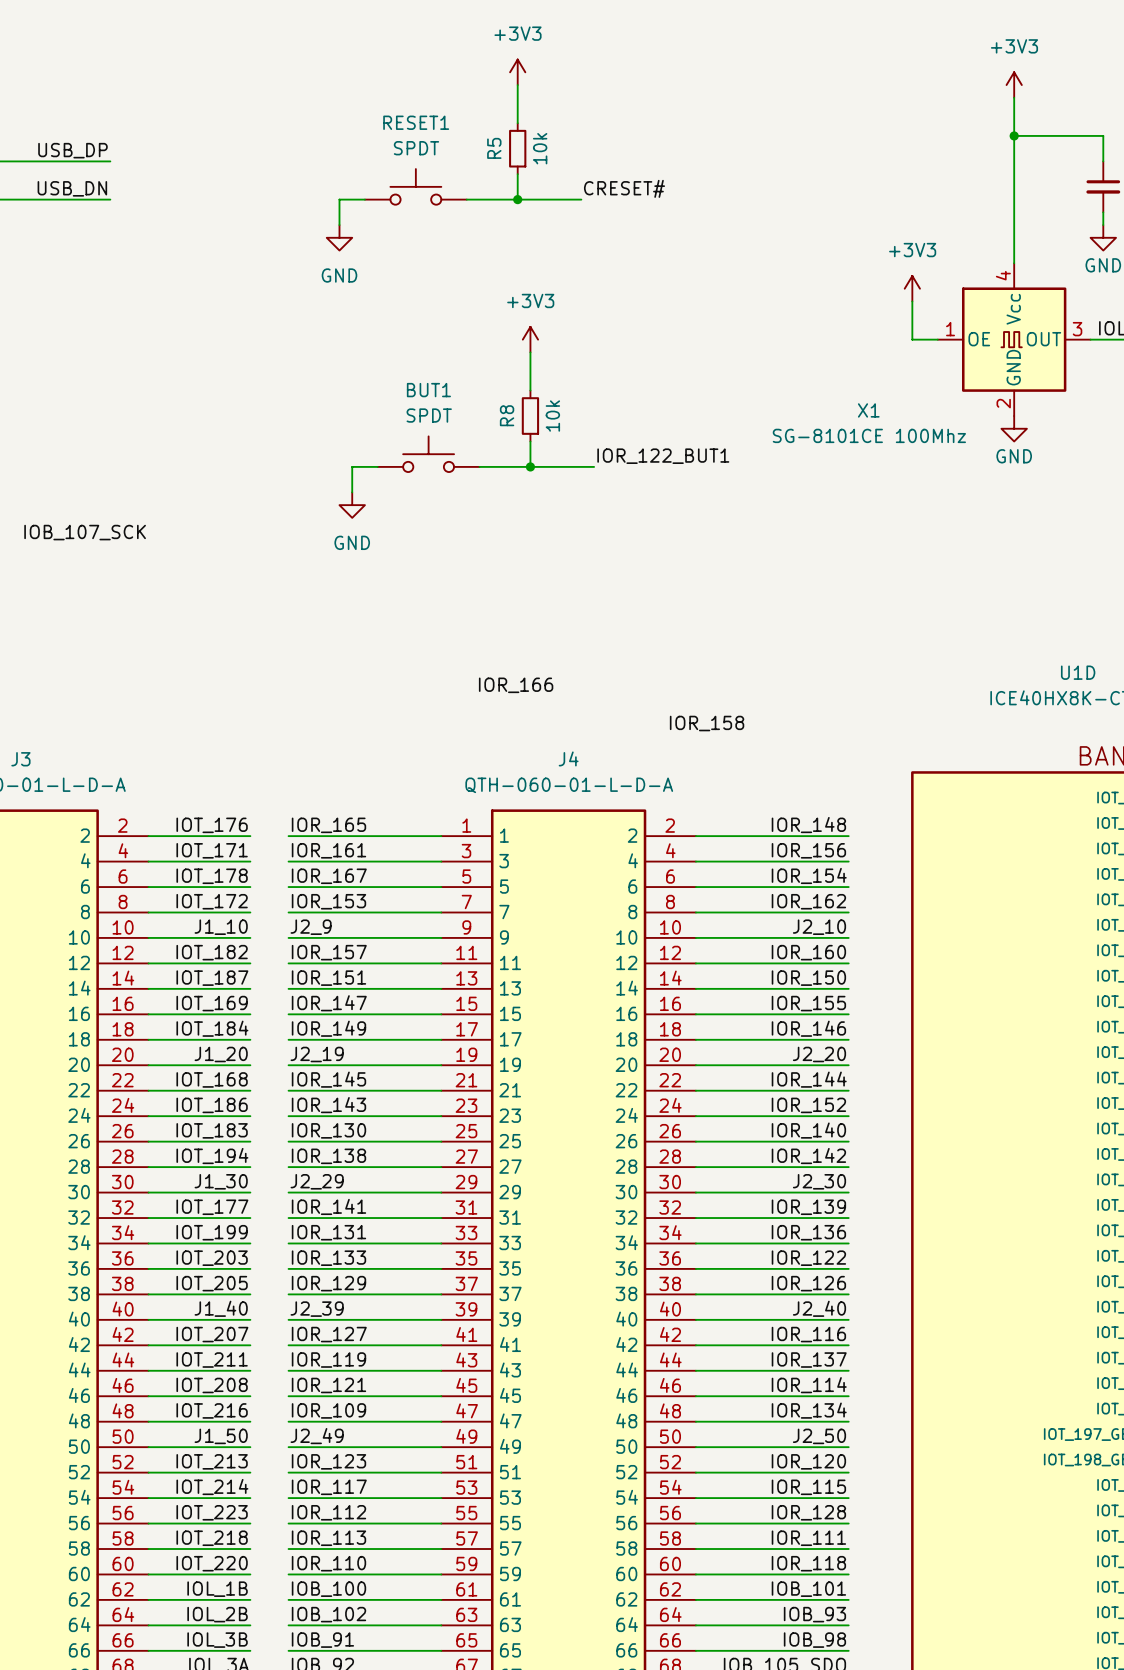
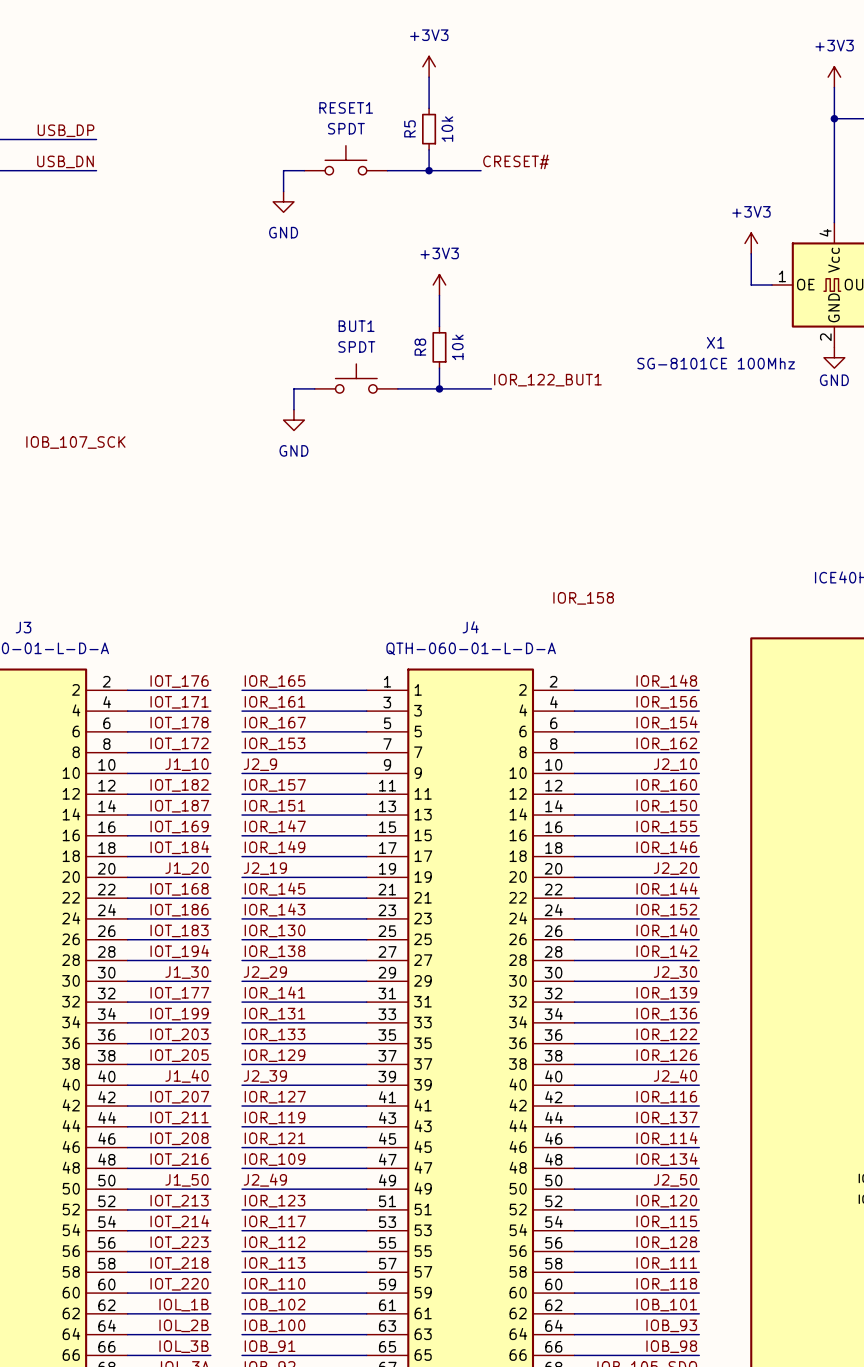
label: IOR_166 (516, 685) -> none
label: IOB_100 (328, 1589) -> IOB_102 (275, 1305)
label: IOB_102 (328, 1614) -> IOB_100 (275, 1325)

